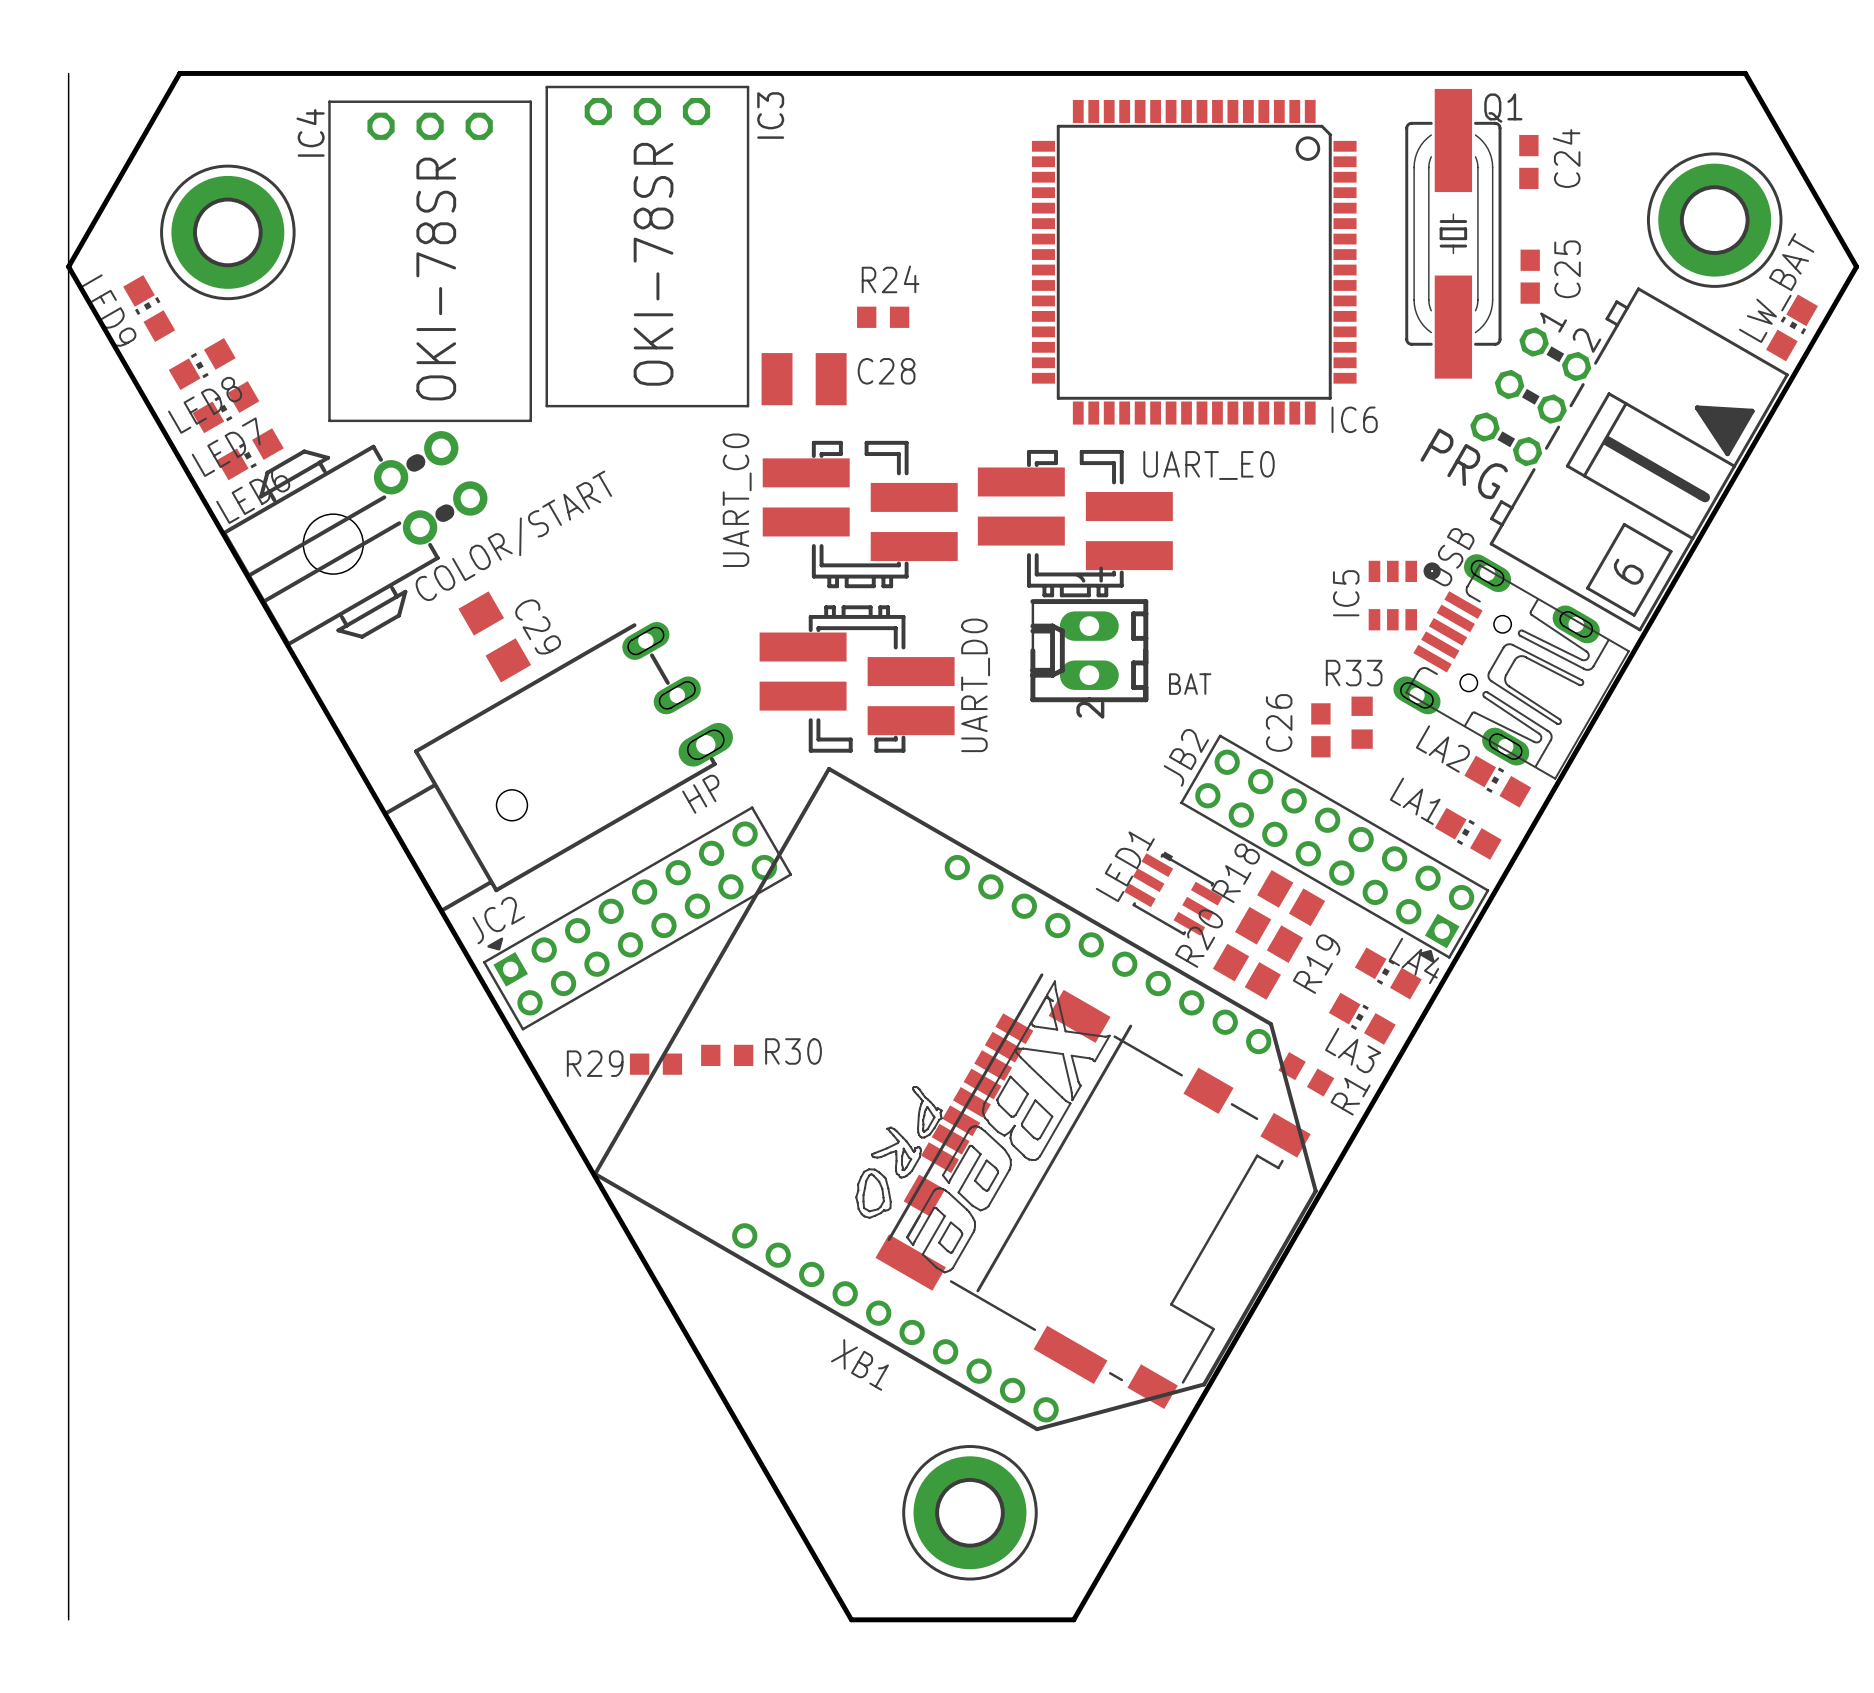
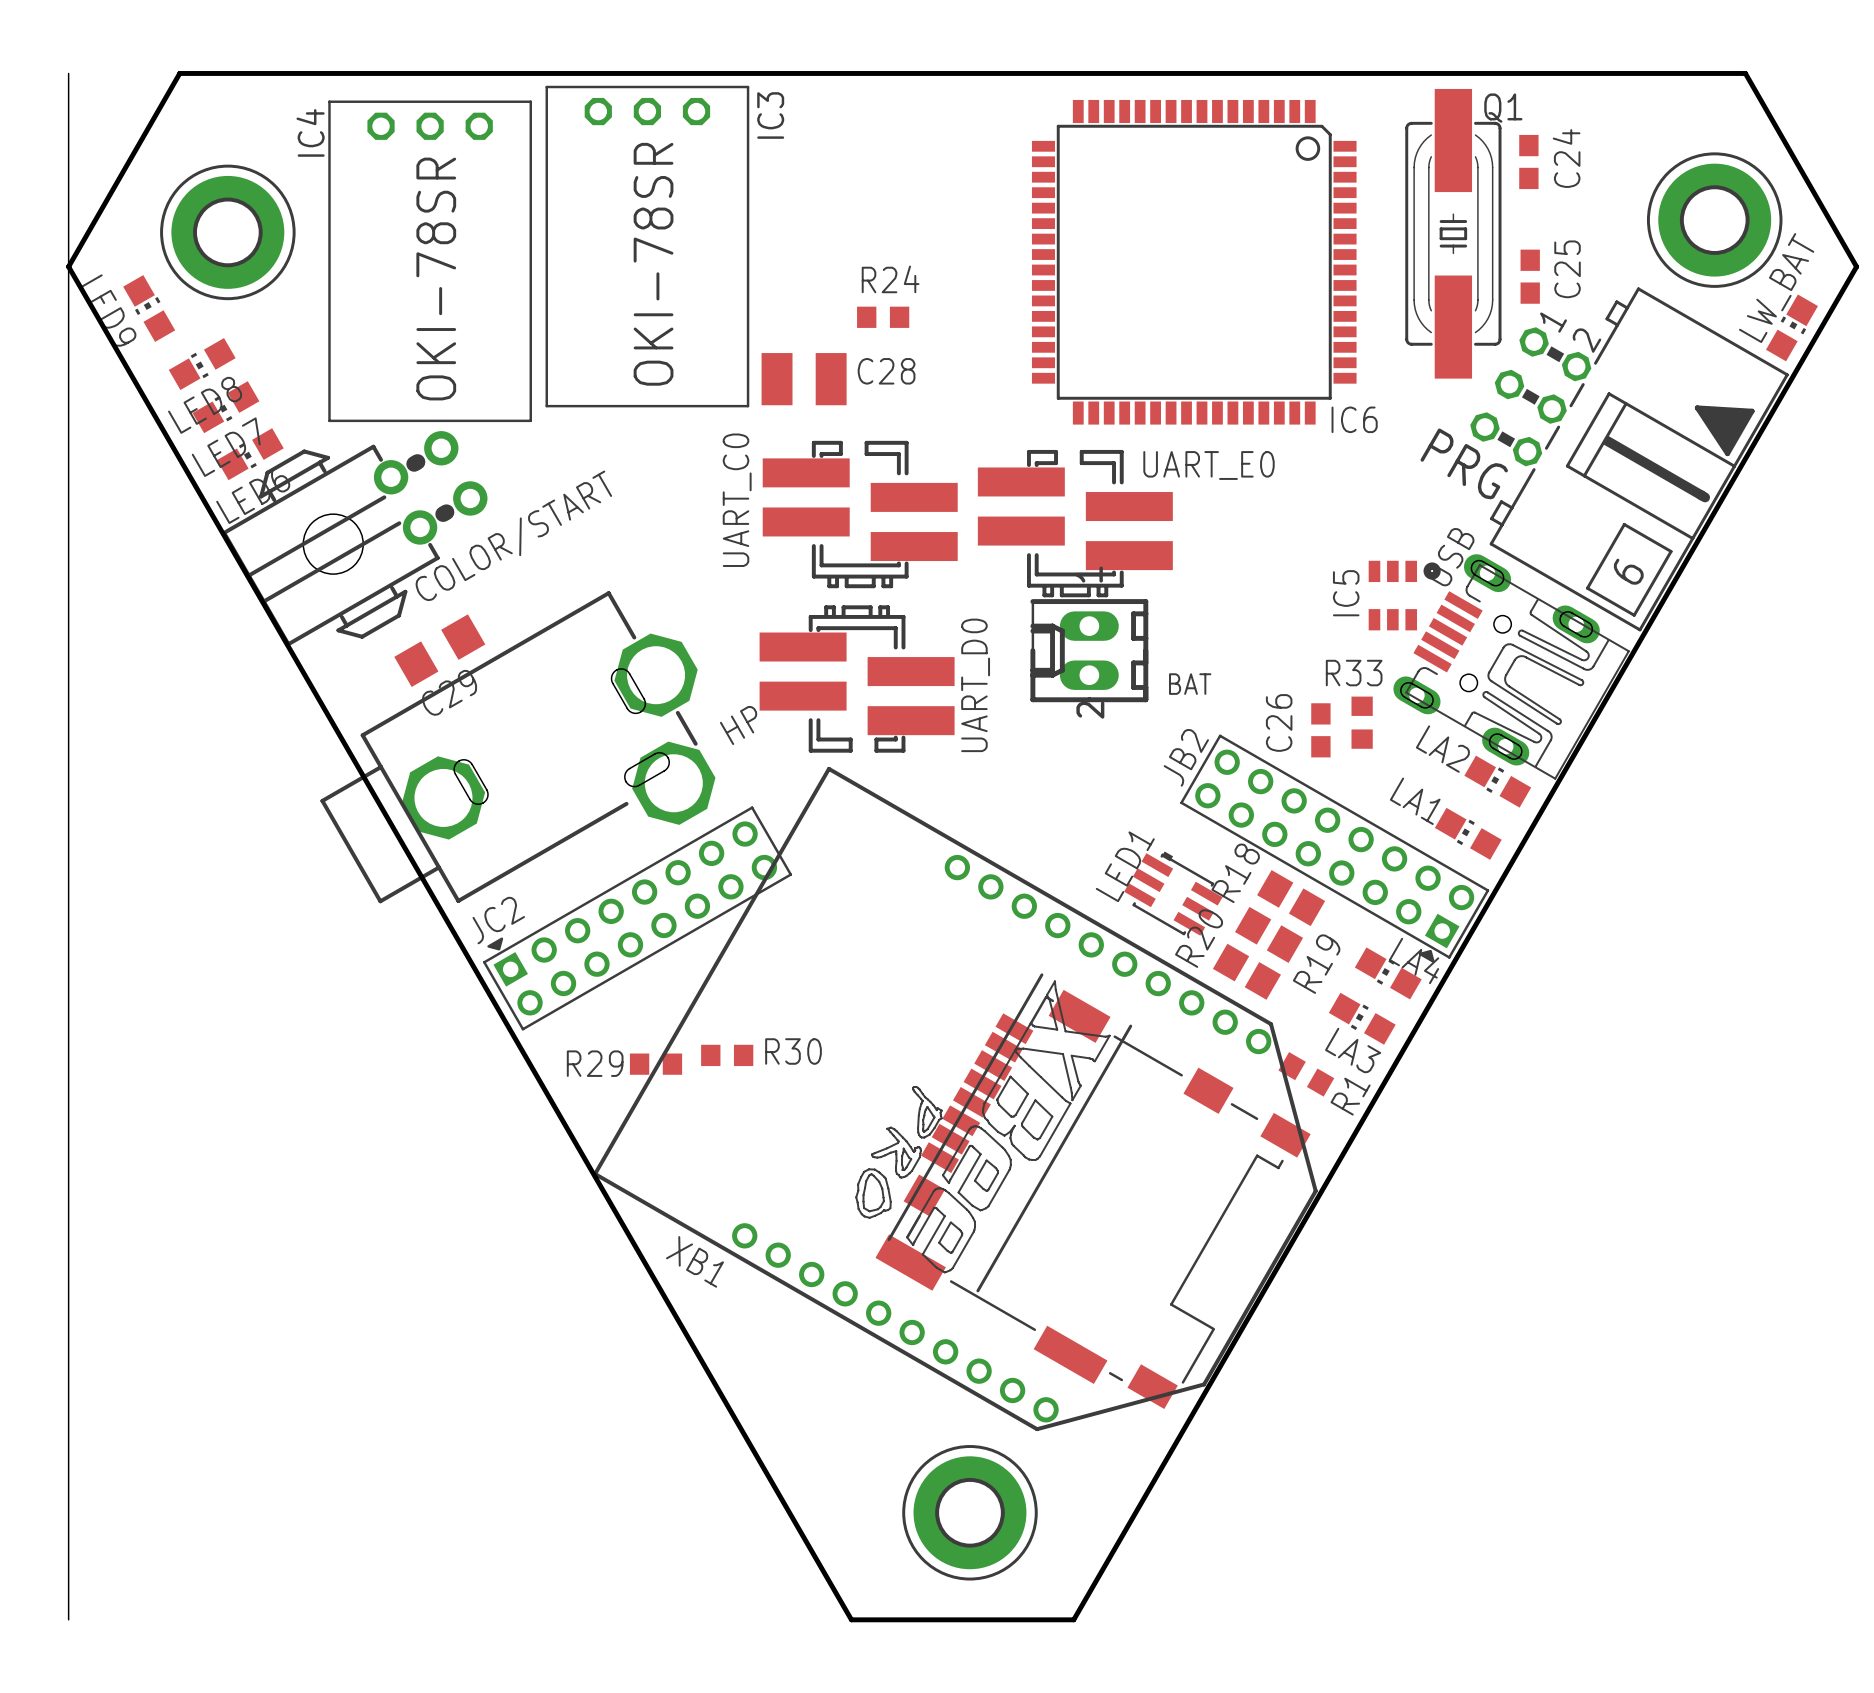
C29 rotation: 0° (494, 636) -> 90° clockwise (439, 650)
C29 position: (494, 636) -> (439, 650)
HP: none -> (517, 747)
HP: (558, 767) -> none
XB1 name position: XB1 (859, 1364) -> XB1 (695, 1261)

